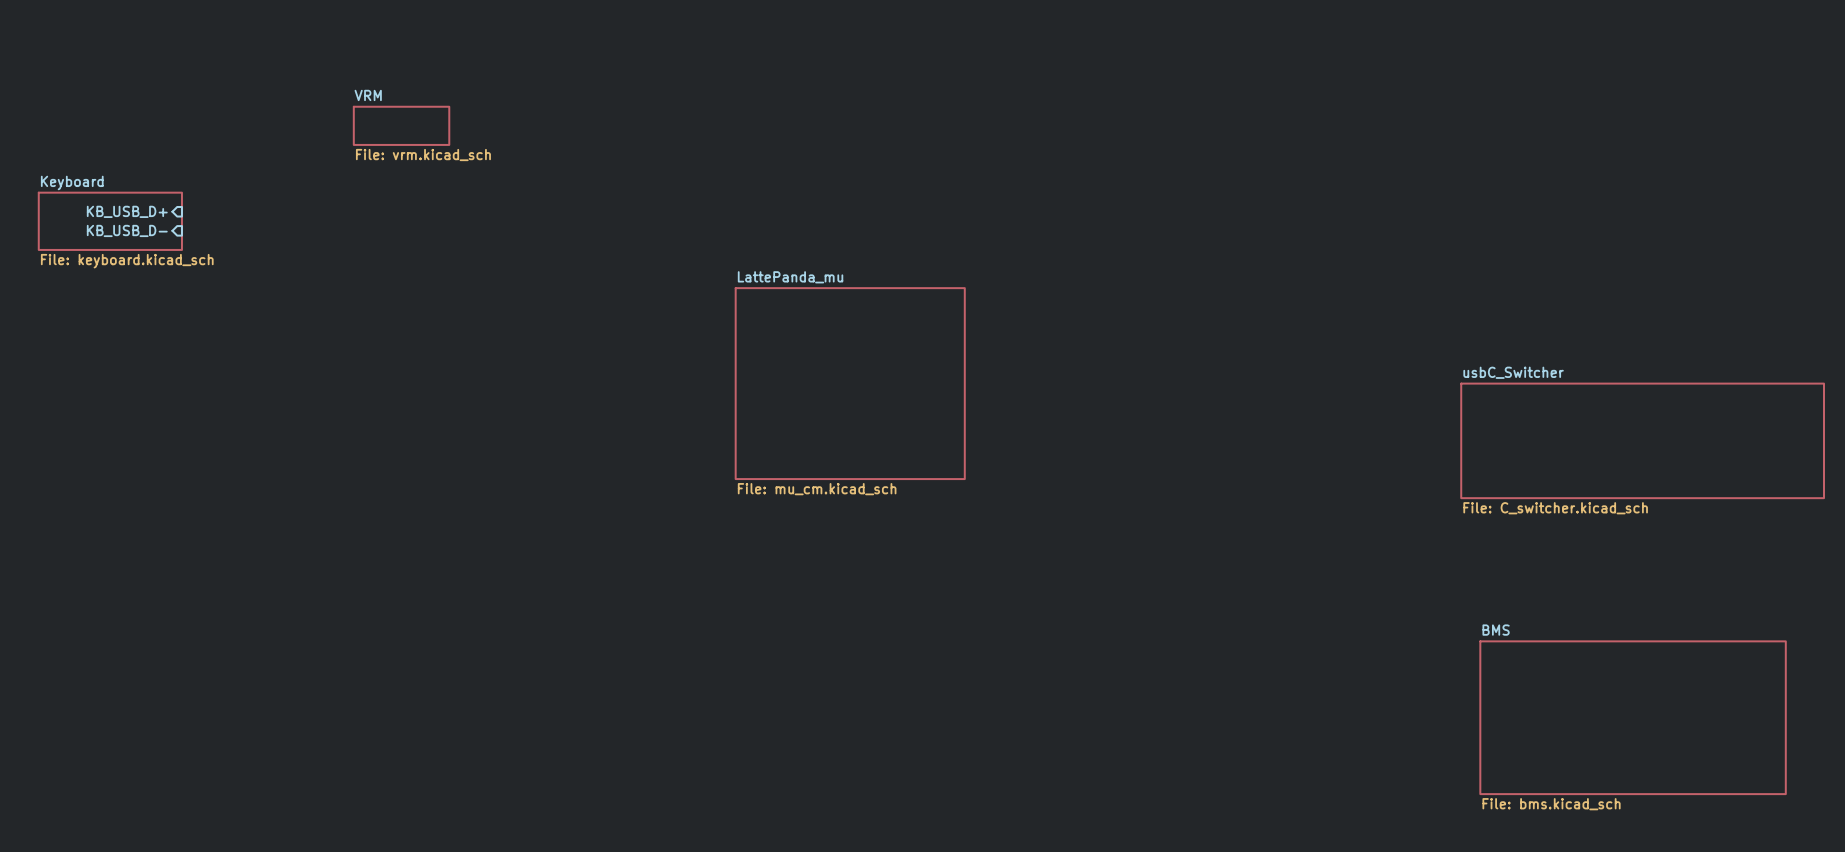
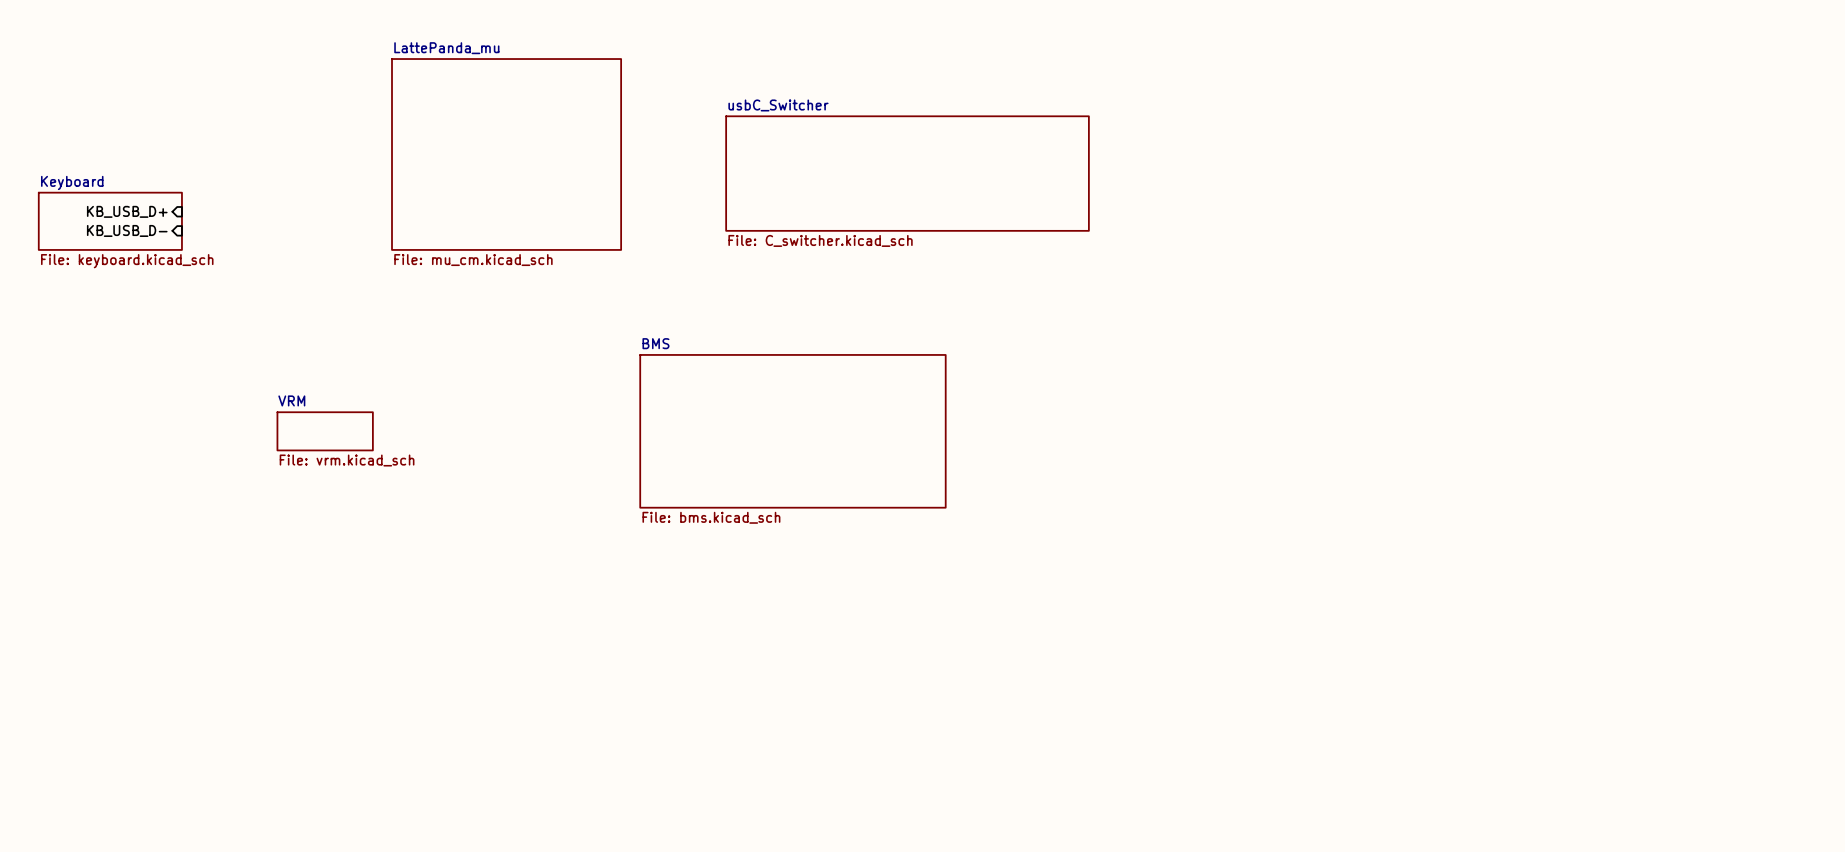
sheet VRM: File: vrm.kicad_sch (401, 125) -> none
sheet LattePanda_mu: none -> File: mu_cm.kicad_sch (506, 154)
sheet usbC_Switcher: none -> File: C_switcher.kicad_sch (907, 173)
sheet LattePanda_mu: File: mu_cm.kicad_sch (850, 383) -> none
sheet VRM: none -> File: vrm.kicad_sch (325, 431)
sheet BMS: none -> File: bms.kicad_sch (792, 431)
sheet usbC_Switcher: File: C_switcher.kicad_sch (1642, 440) -> none
sheet BMS: File: bms.kicad_sch (1633, 717) -> none

